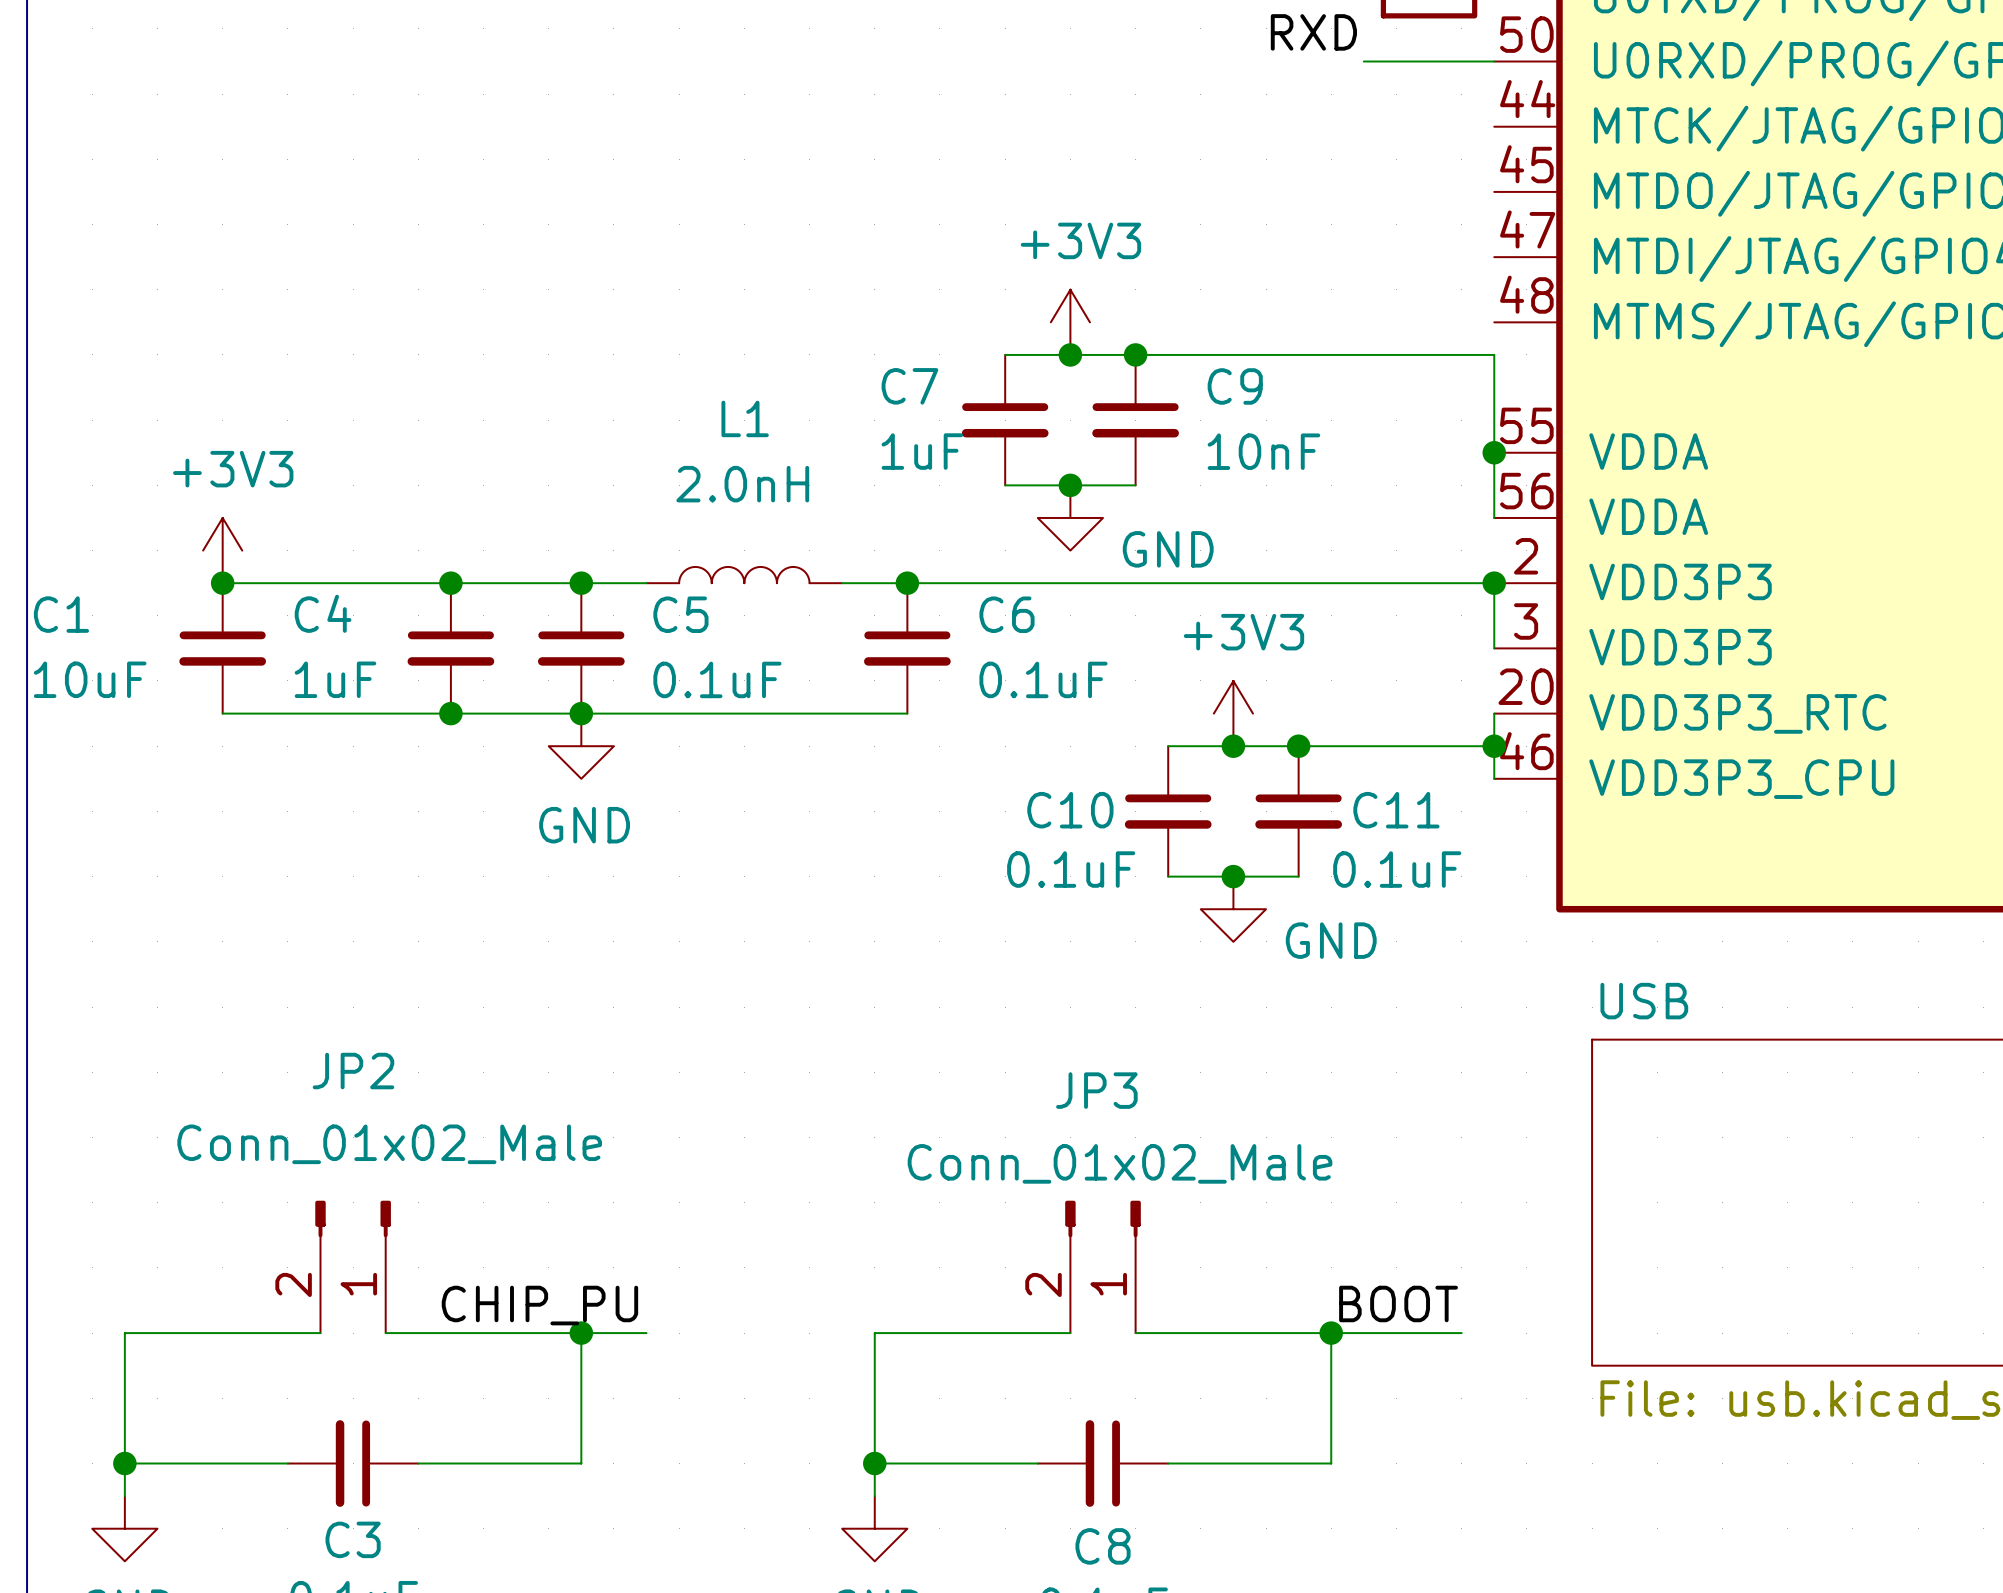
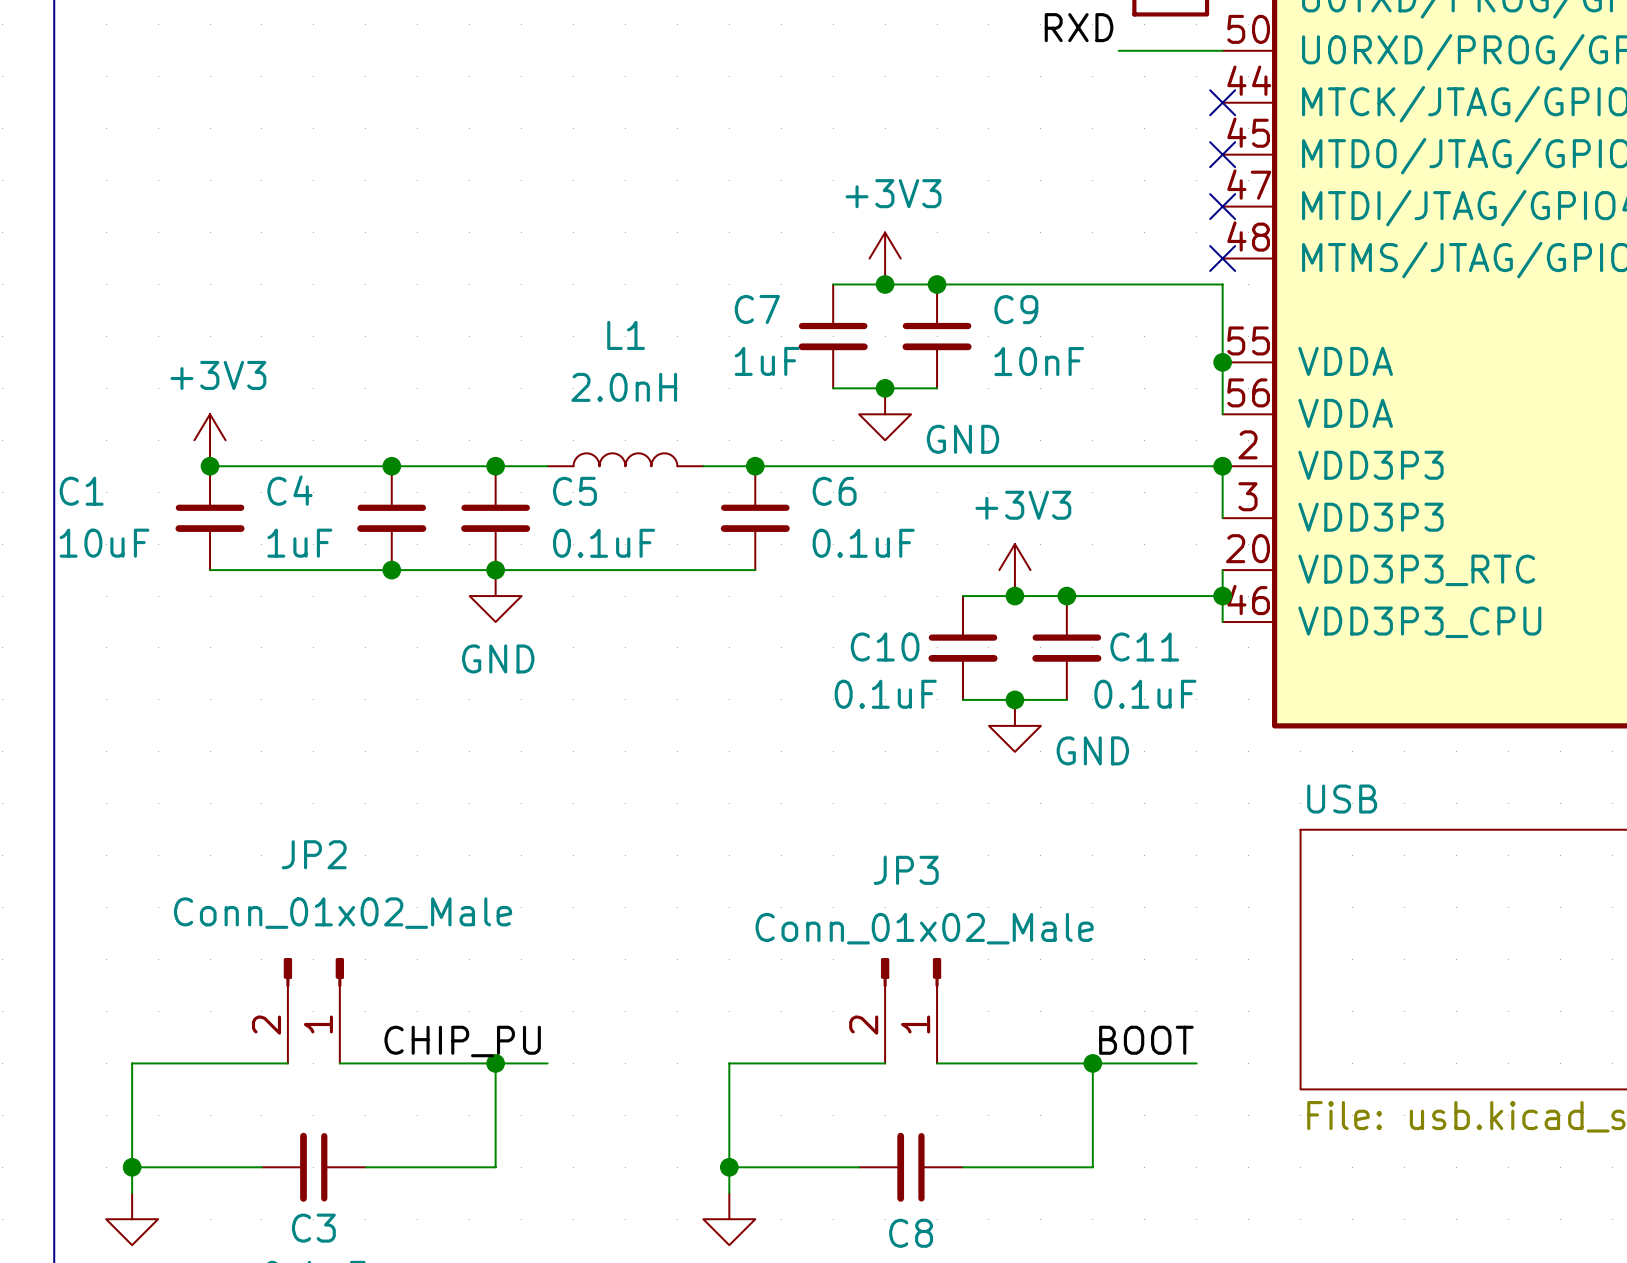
no-connect mark: none -> (1222, 102)
no-connect mark: none -> (1222, 154)
no-connect mark: none -> (1222, 206)
no-connect mark: none -> (1222, 258)

